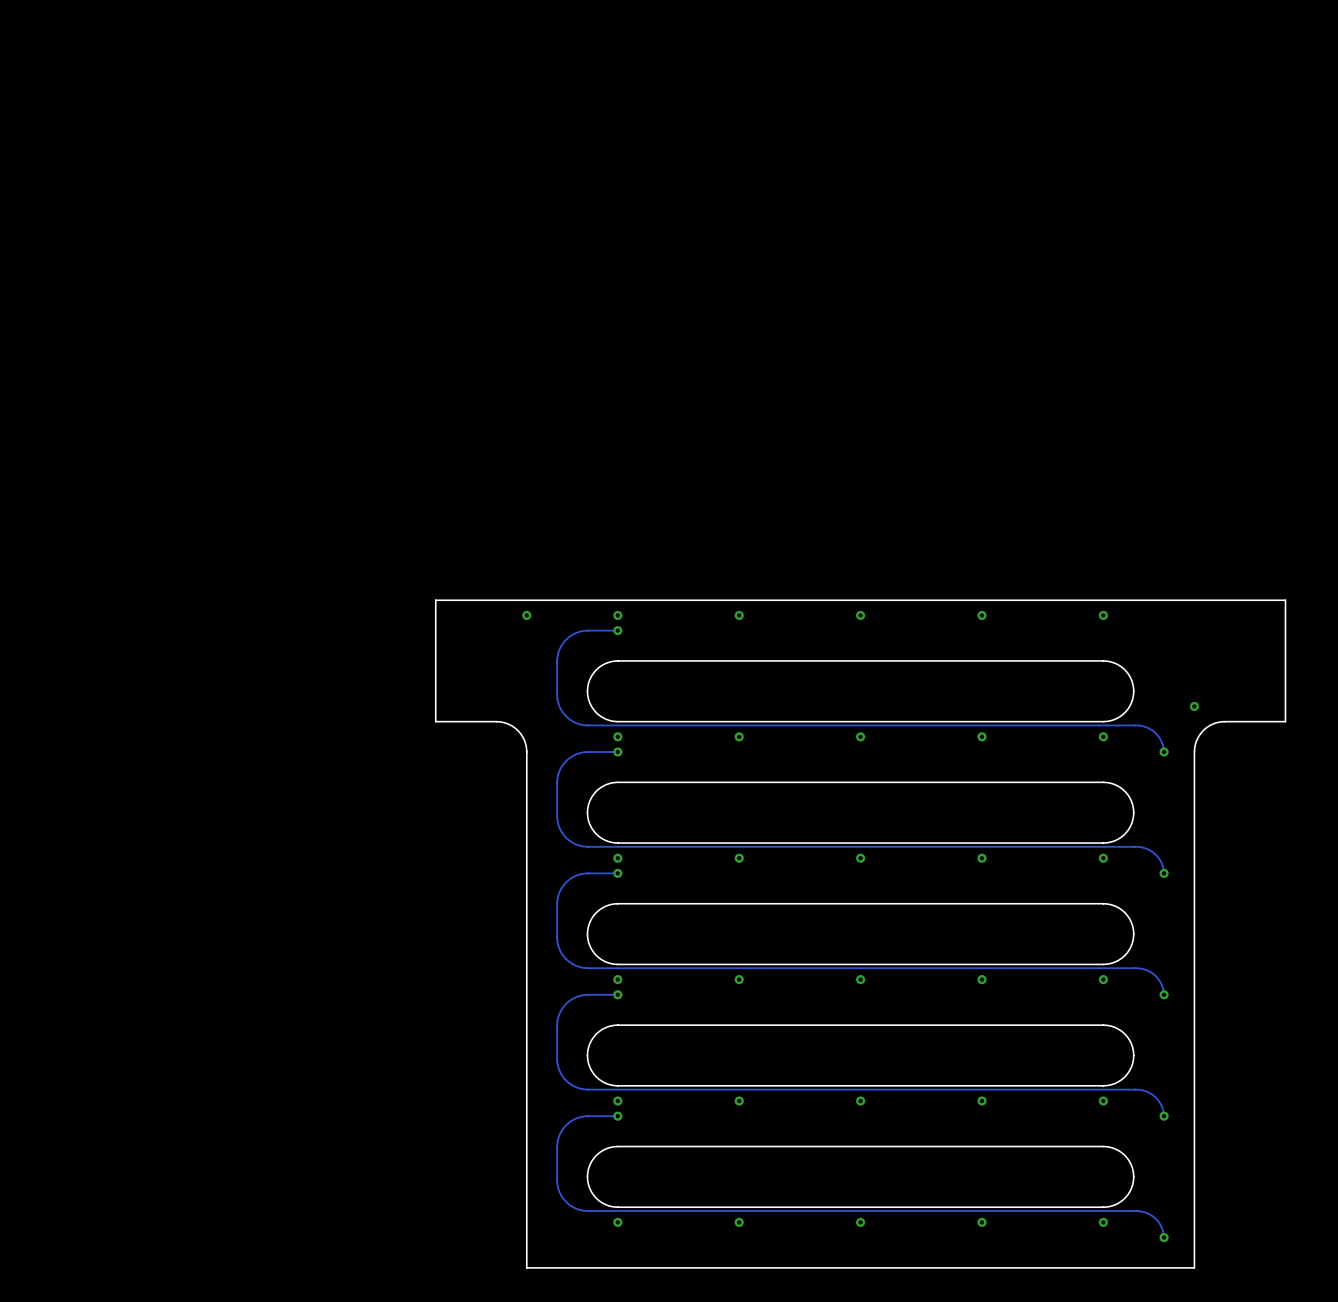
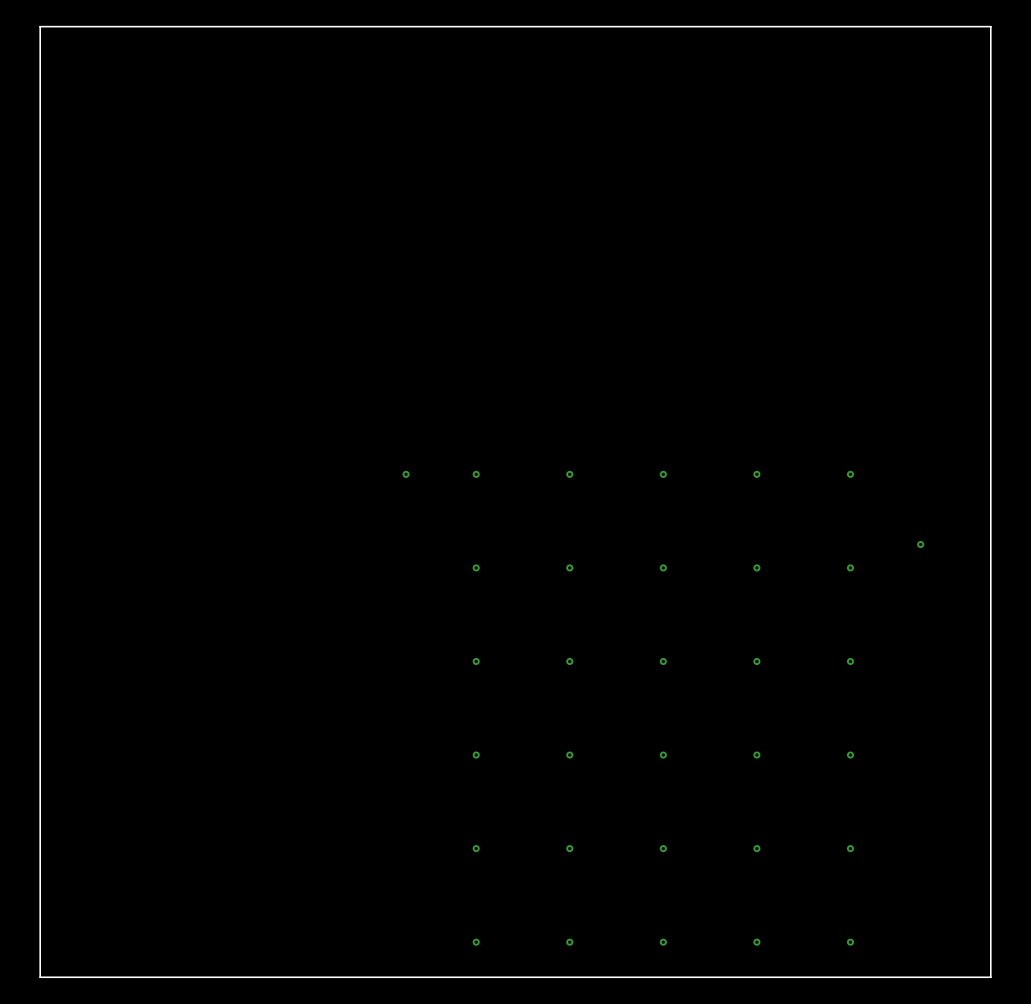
board edge: (1285, 600) (435, 600) (435, 721) (504, 722) (517, 730) (522, 736) (526, 748) (526, 1267) -> (990, 462) (990, 26) (40, 26) (40, 977) (406, 977)
track: (617, 630) (579, 631) (566, 639) (559, 649) (557, 661) (558, 702) (566, 716) (576, 723) (587, 725) (1138, 725) (1155, 732) (1161, 741) (1164, 752) -> none
via: (617, 630) -> none
board edge: (1103, 660) (617, 660) (606, 663) (596, 669) (589, 679) (587, 691) (589, 702) (596, 712) (606, 719) (617, 721) (1103, 721) (1115, 719) (1124, 712) (1131, 702) (1133, 691) (1131, 679) (1124, 669) (1115, 663) (1103, 660) -> none
board edge: (1285, 721) (1216, 722) (1203, 730) (1198, 736) (1194, 748) (1194, 1267) -> (990, 556) (990, 977) (920, 977)
track: (617, 752) (579, 753) (566, 761) (559, 771) (557, 782) (558, 823) (566, 837) (576, 844) (587, 846) (1138, 846) (1155, 854) (1161, 862) (1164, 873) -> none
via: (617, 752) -> none
via: (1164, 752) -> none
board edge: (1103, 782) (617, 782) (606, 784) (596, 791) (589, 801) (587, 812) (589, 824) (596, 834) (606, 840) (617, 843) (1103, 843) (1115, 840) (1124, 834) (1131, 824) (1133, 812) (1131, 801) (1124, 791) (1115, 784) (1103, 782) -> none
track: (617, 873) (579, 874) (569, 879) (559, 892) (557, 904) (558, 945) (566, 959) (576, 965) (587, 968) (1138, 968) (1149, 971) (1157, 978) (1164, 994) -> none
via: (617, 873) -> none
via: (1164, 873) -> none
board edge: (1103, 903) (617, 903) (606, 906) (596, 912) (589, 922) (587, 934) (589, 945) (596, 955) (606, 962) (617, 964) (1103, 964) (1115, 962) (1124, 955) (1131, 945) (1133, 934) (1131, 922) (1124, 912) (1115, 906) (1103, 903) -> none
track: (617, 994) (579, 995) (566, 1003) (559, 1013) (557, 1025) (558, 1066) (566, 1080) (576, 1087) (587, 1089) (1138, 1089) (1149, 1092) (1157, 1099) (1164, 1116) -> none
via: (617, 994) -> none
via: (1164, 994) -> none
board edge: (1103, 1025) (617, 1025) (606, 1027) (596, 1034) (589, 1043) (587, 1055) (589, 1067) (596, 1076) (606, 1083) (617, 1085) (1103, 1085) (1115, 1083) (1124, 1076) (1131, 1067) (1133, 1055) (1131, 1043) (1124, 1034) (1115, 1027) (1103, 1025) -> none
track: (617, 1116) (579, 1117) (566, 1125) (559, 1135) (557, 1147) (558, 1188) (563, 1198) (576, 1208) (587, 1211) (1138, 1211) (1155, 1218) (1161, 1227) (1164, 1237) -> none
via: (617, 1116) -> none
via: (1164, 1116) -> none
board edge: (1103, 1146) (617, 1146) (606, 1148) (596, 1155) (589, 1165) (587, 1176) (589, 1188) (596, 1198) (606, 1204) (617, 1207) (1103, 1207) (1115, 1204) (1124, 1198) (1131, 1188) (1133, 1176) (1131, 1165) (1124, 1155) (1115, 1148) (1103, 1146) -> none
via: (1164, 1237) -> none

